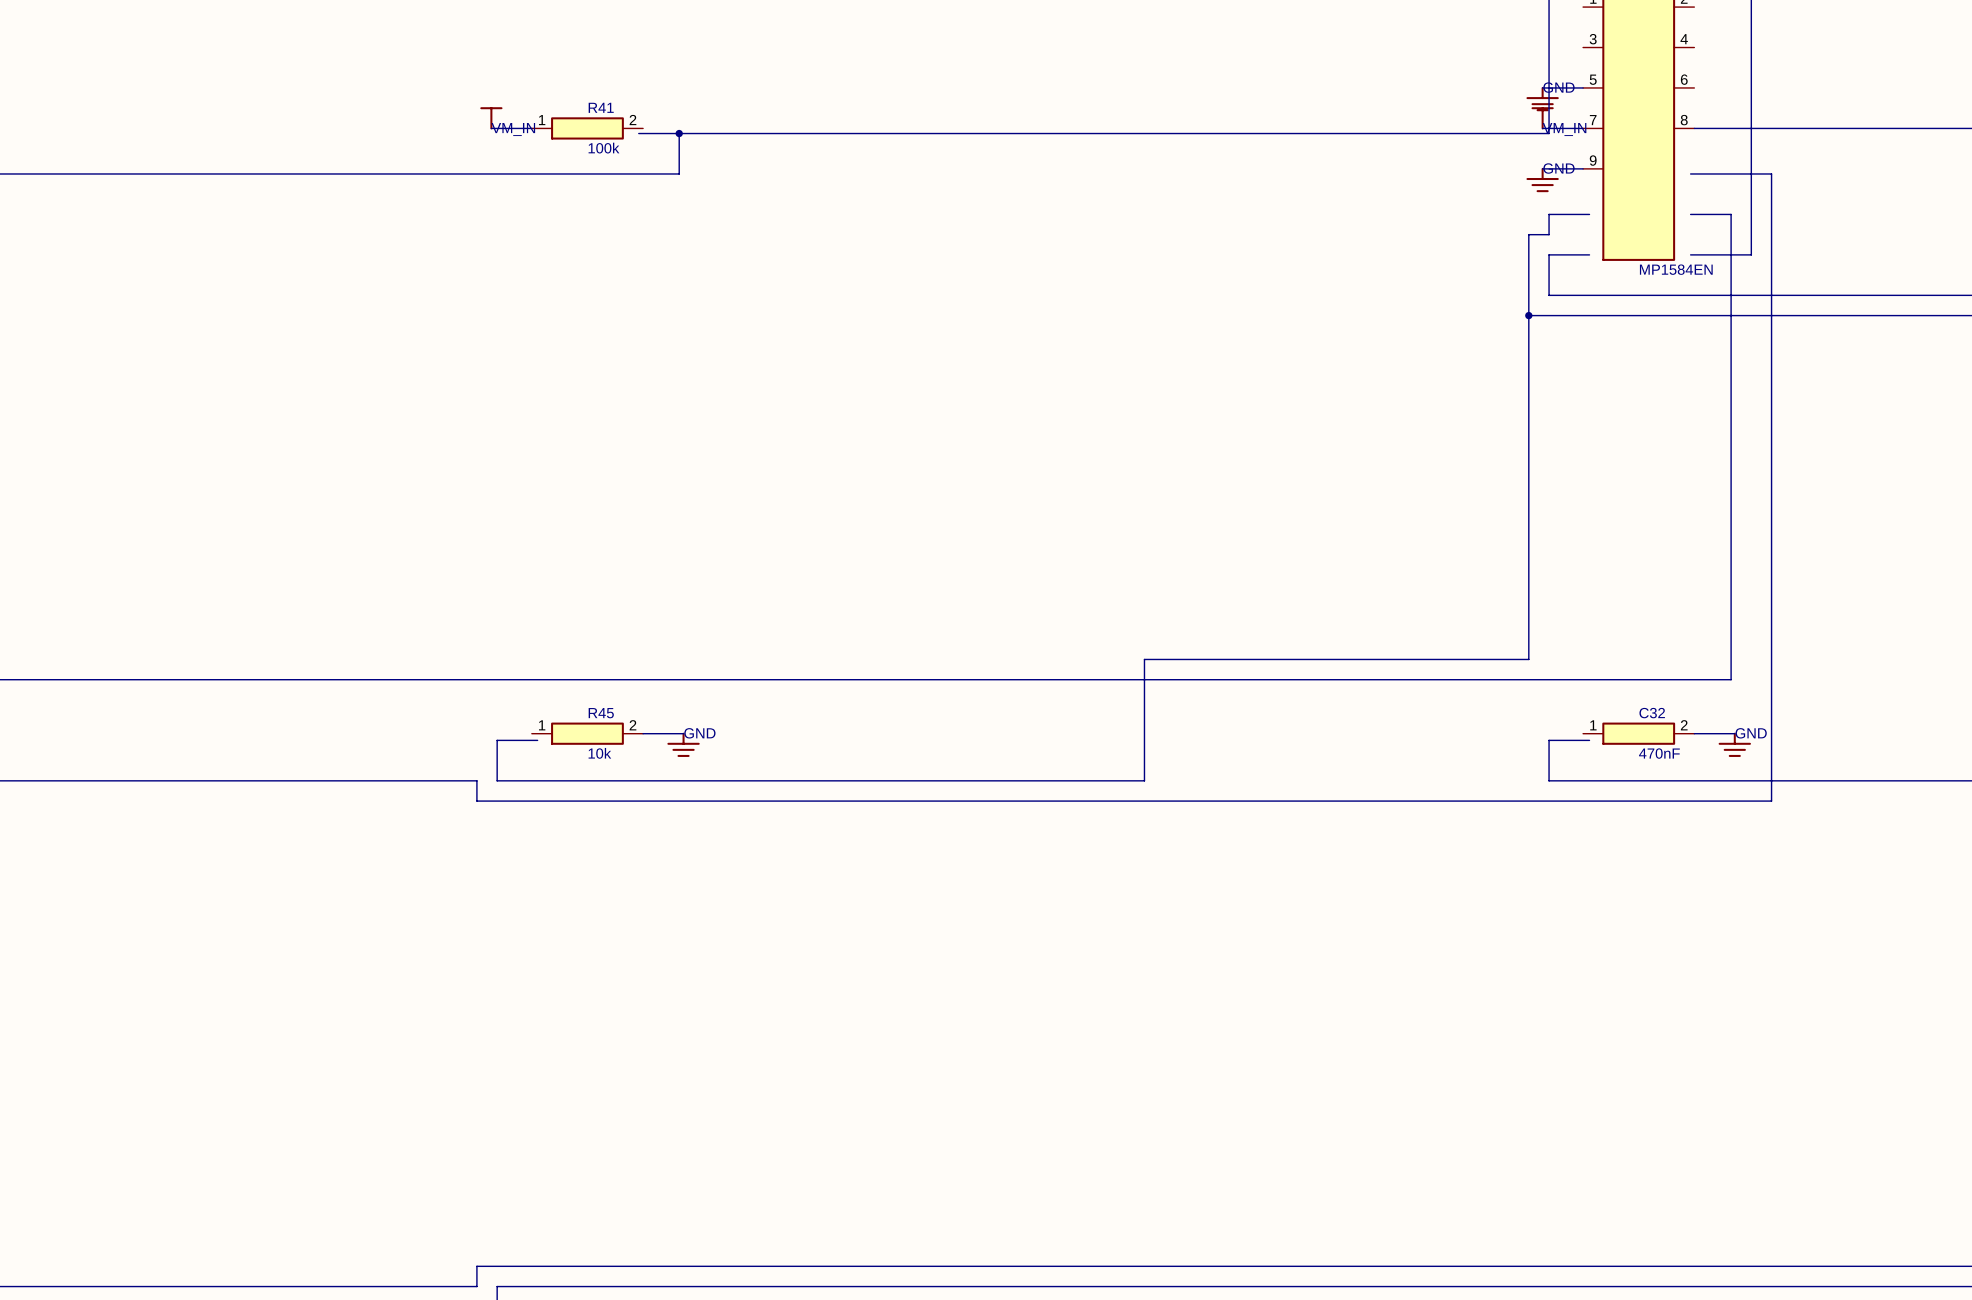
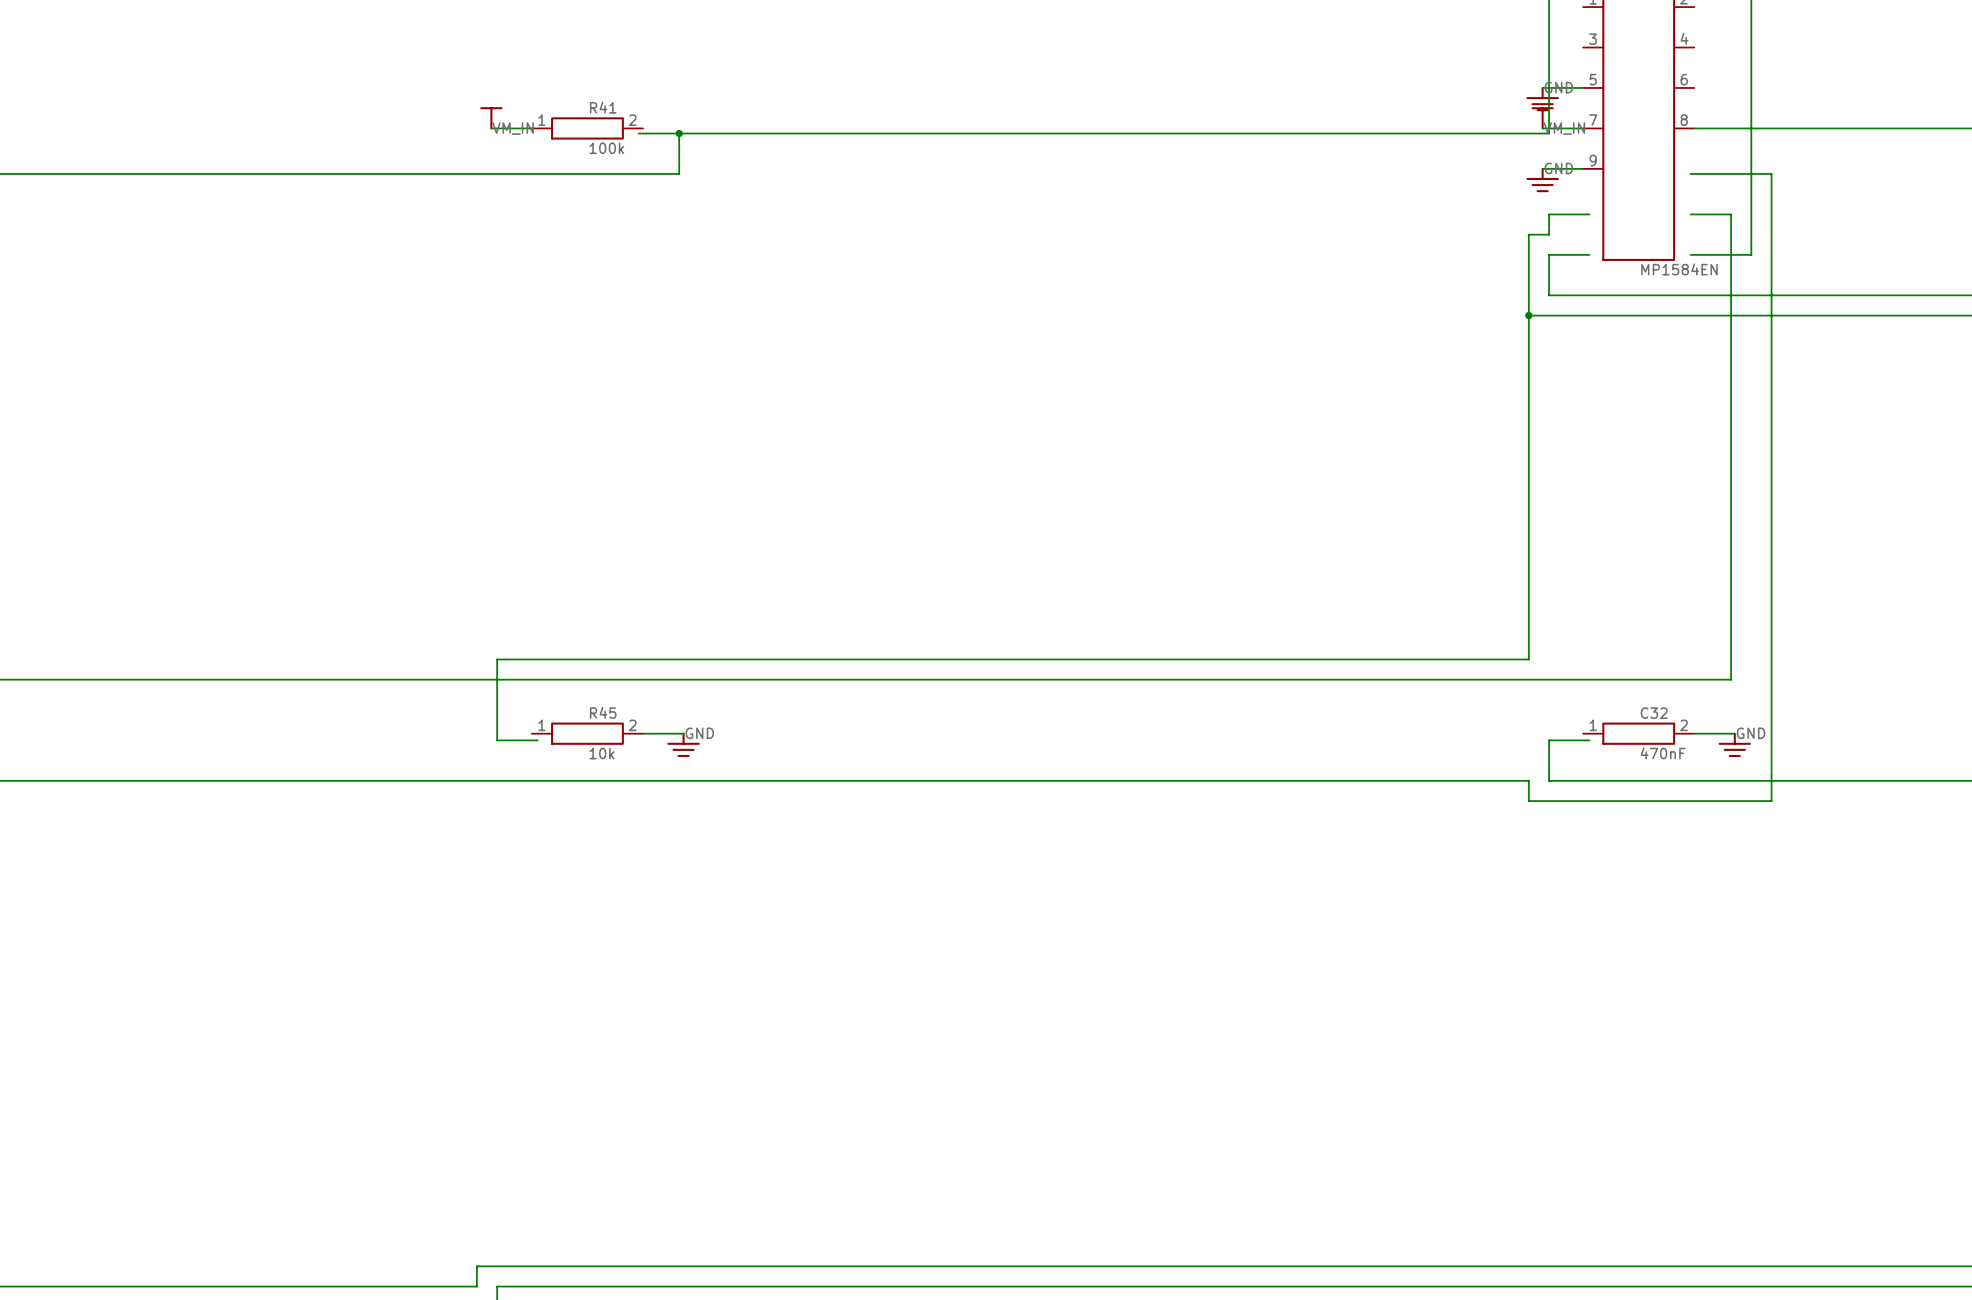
wire: (1144, 659) (1144, 780) -> (1528, 801) (1528, 780) (1144, 780)
wire: none -> (1144, 659) (497, 659) (497, 740)
wire: (497, 740) (497, 780) -> (476, 780) (497, 780)
wire: (476, 780) (476, 801) (1528, 801) -> none

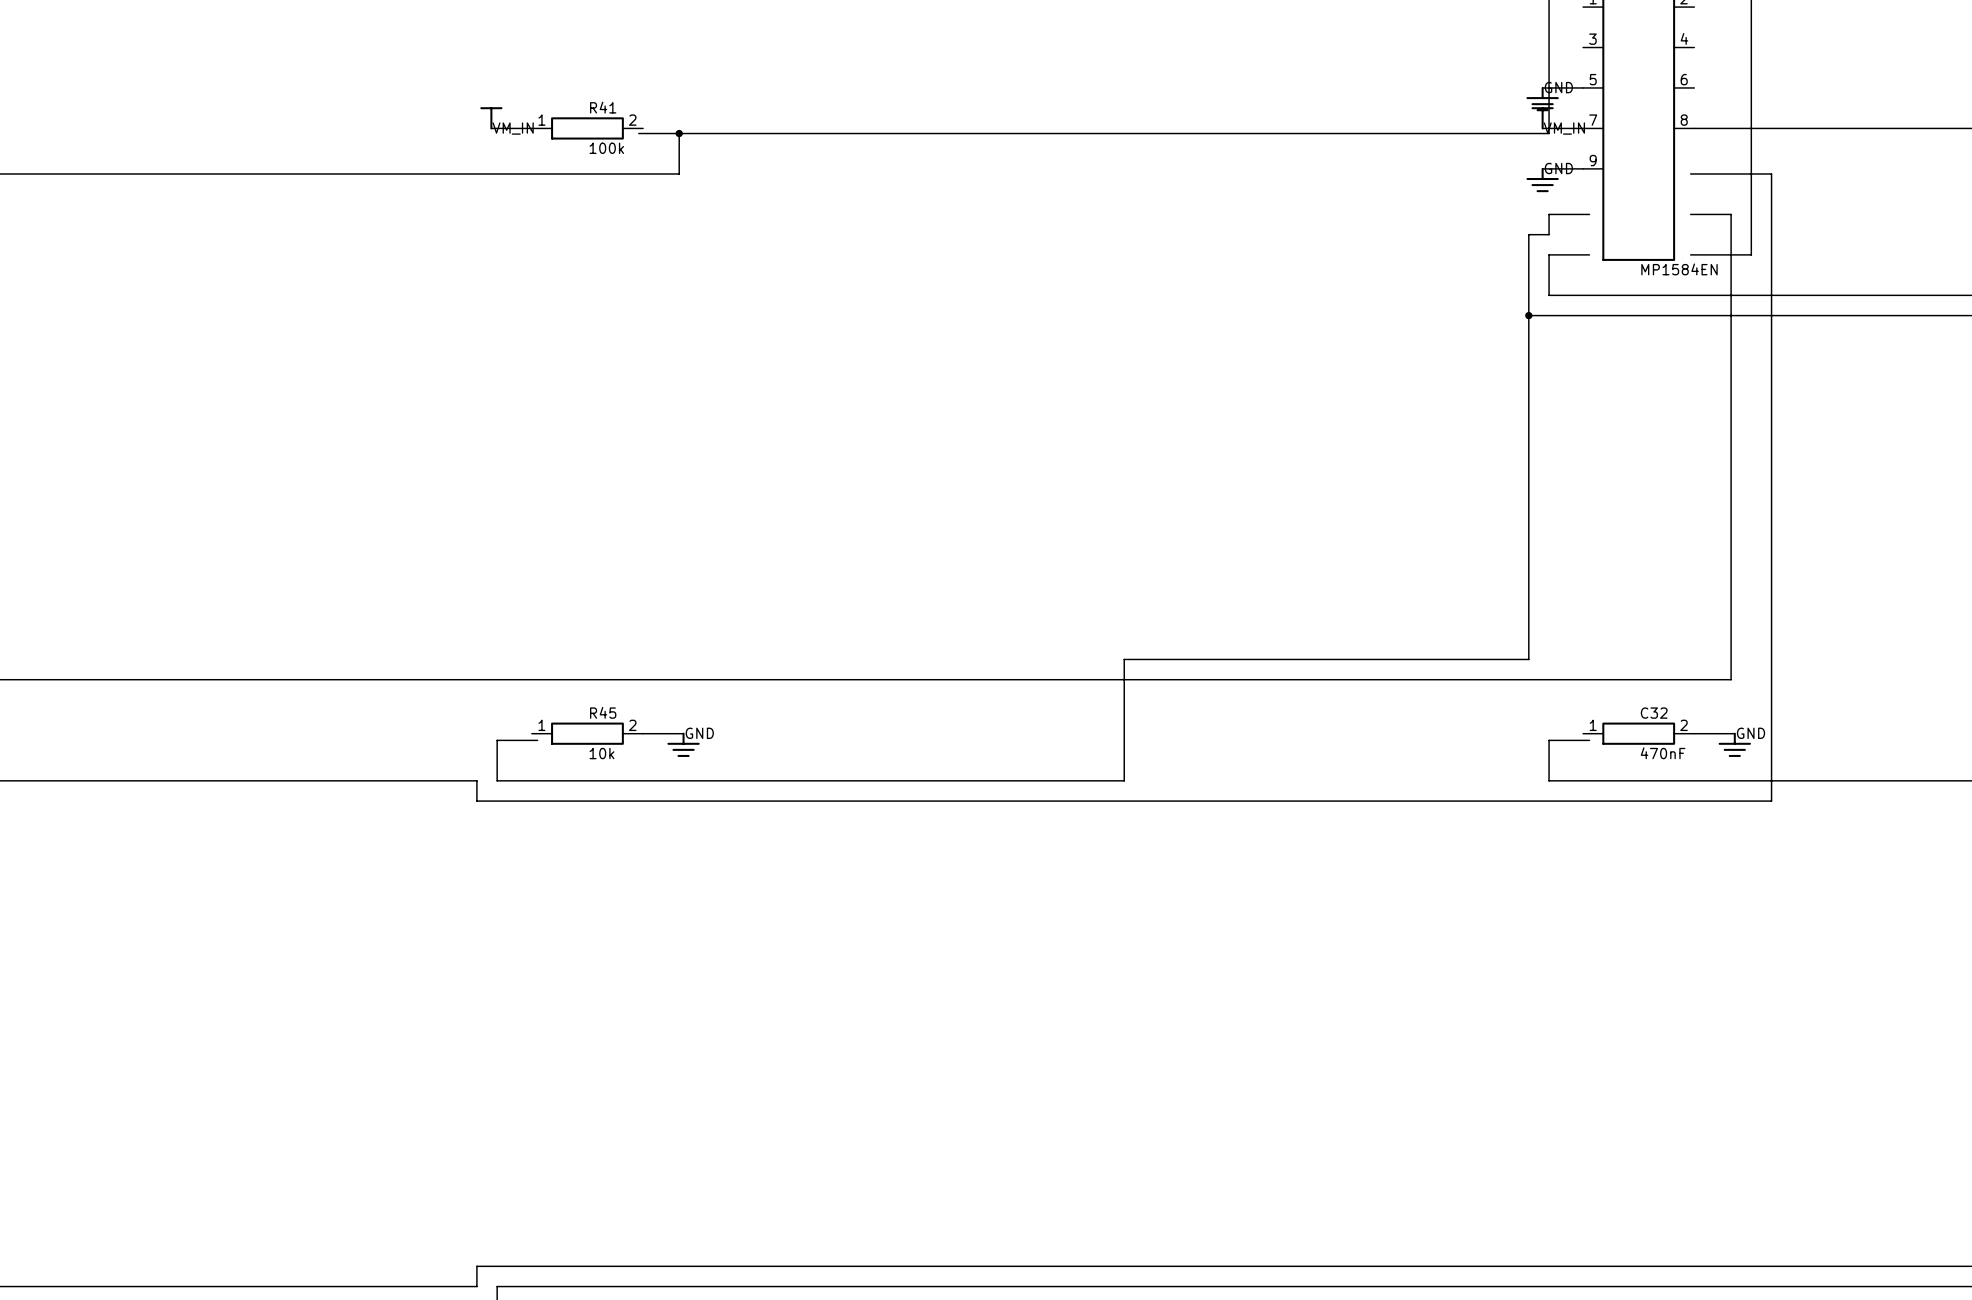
wire: (1124, 659) (497, 659) (497, 740) -> none
wire: (476, 780) (497, 780) -> (497, 740) (497, 780)
wire: none -> (476, 780) (476, 801) (1528, 801)
wire: (1124, 780) (1528, 780) (1528, 801) -> (1124, 780) (1124, 659)

